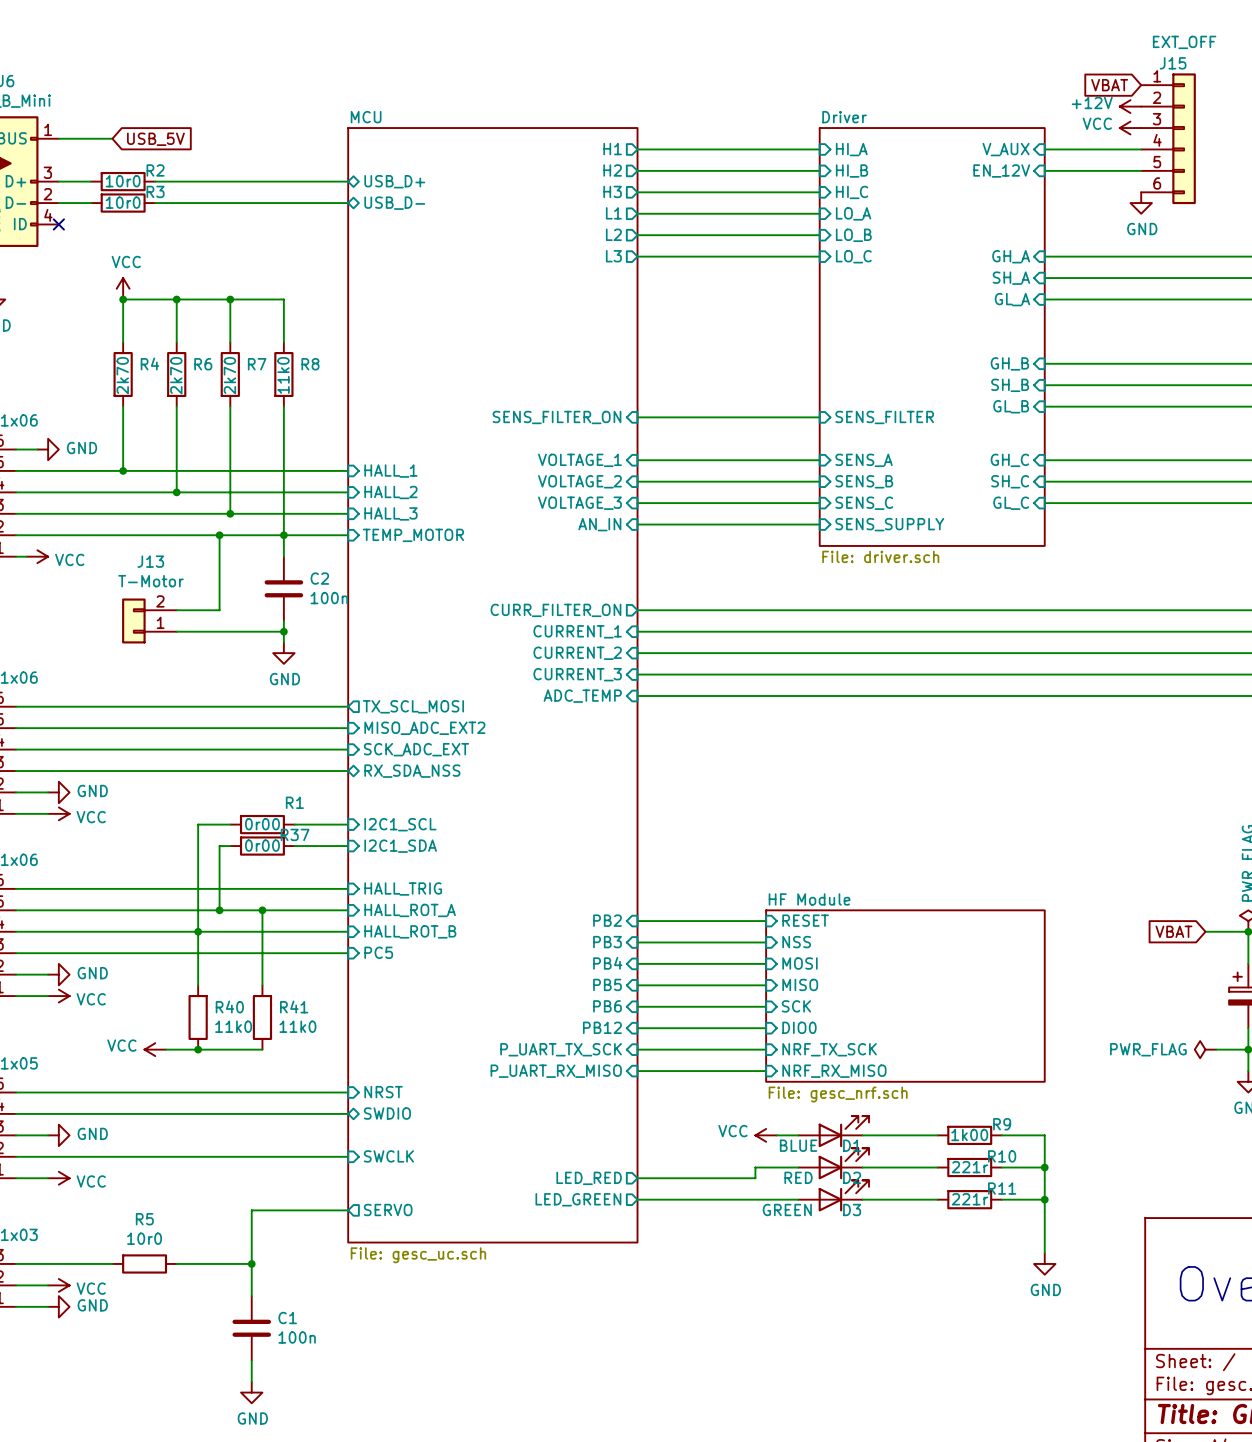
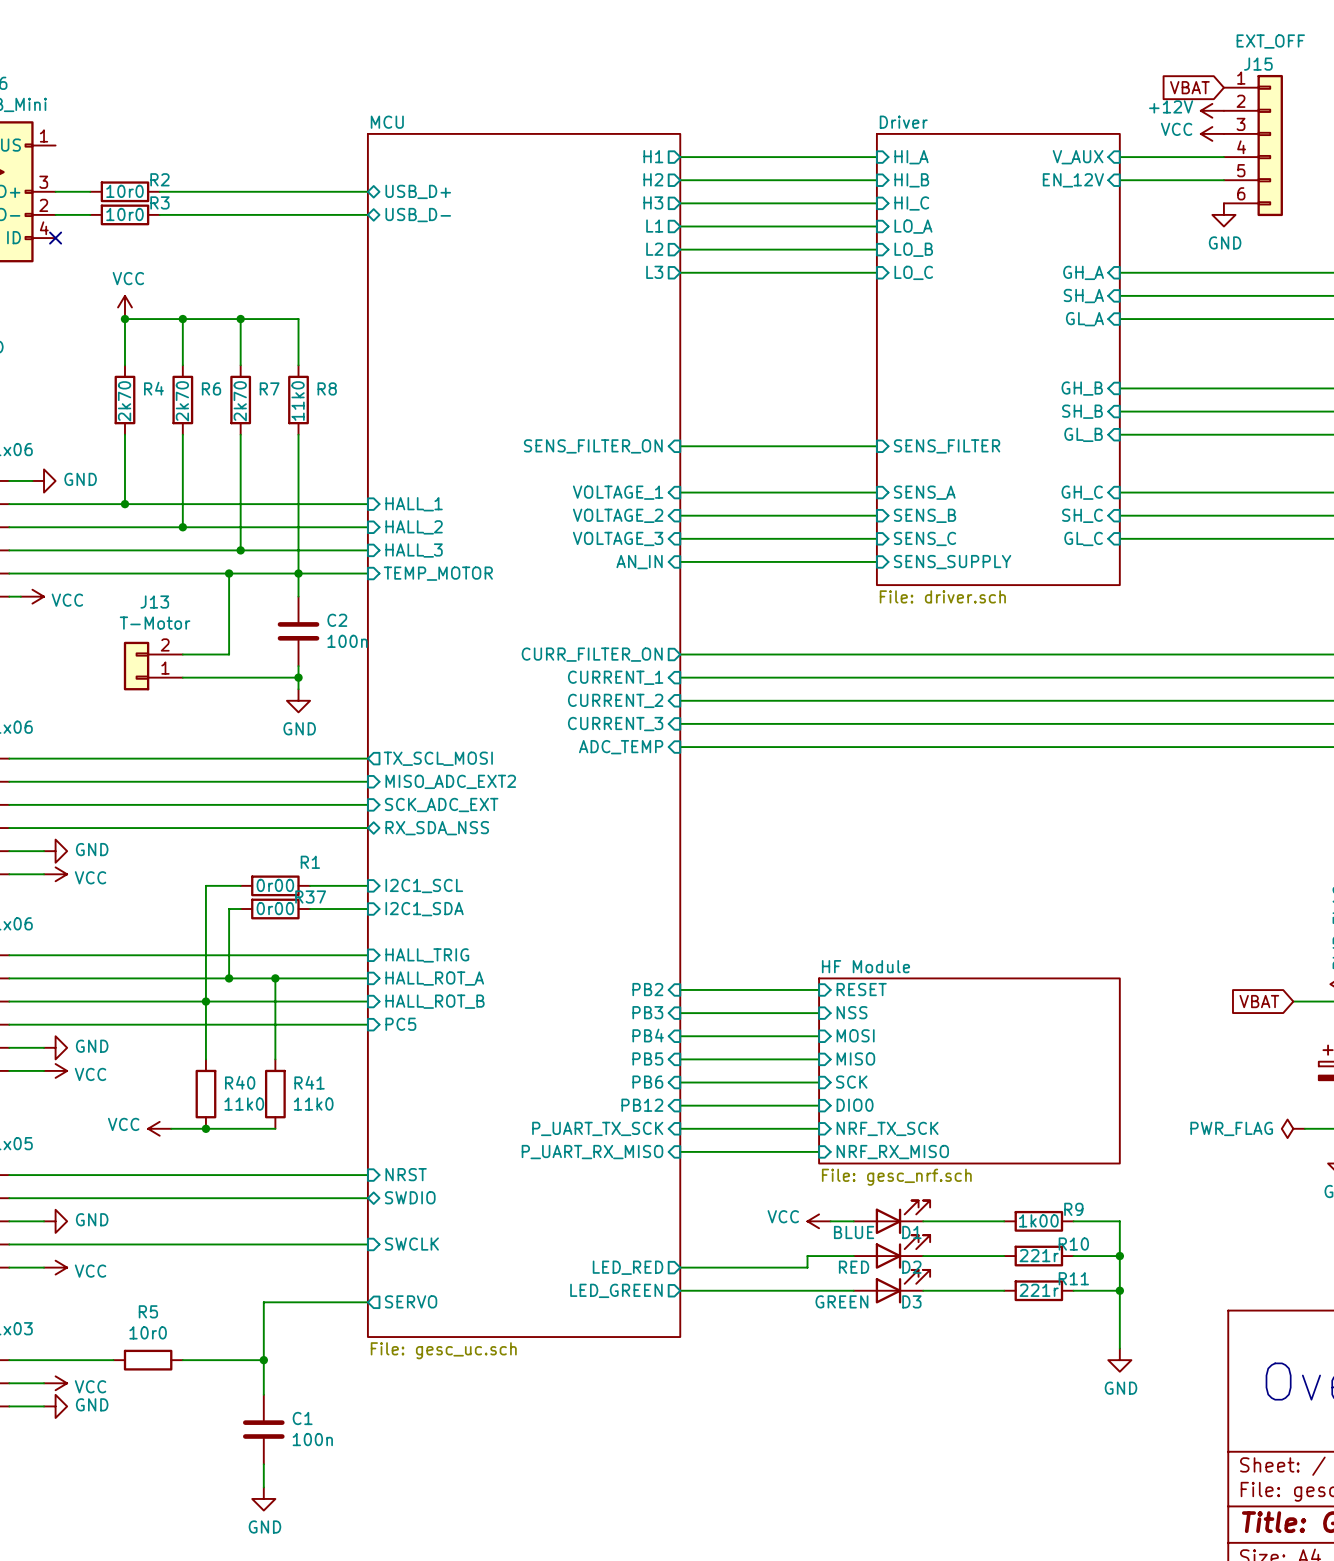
wire: (58, 138) (112, 138) -> none
global label: USB_5V (155, 139) -> none

